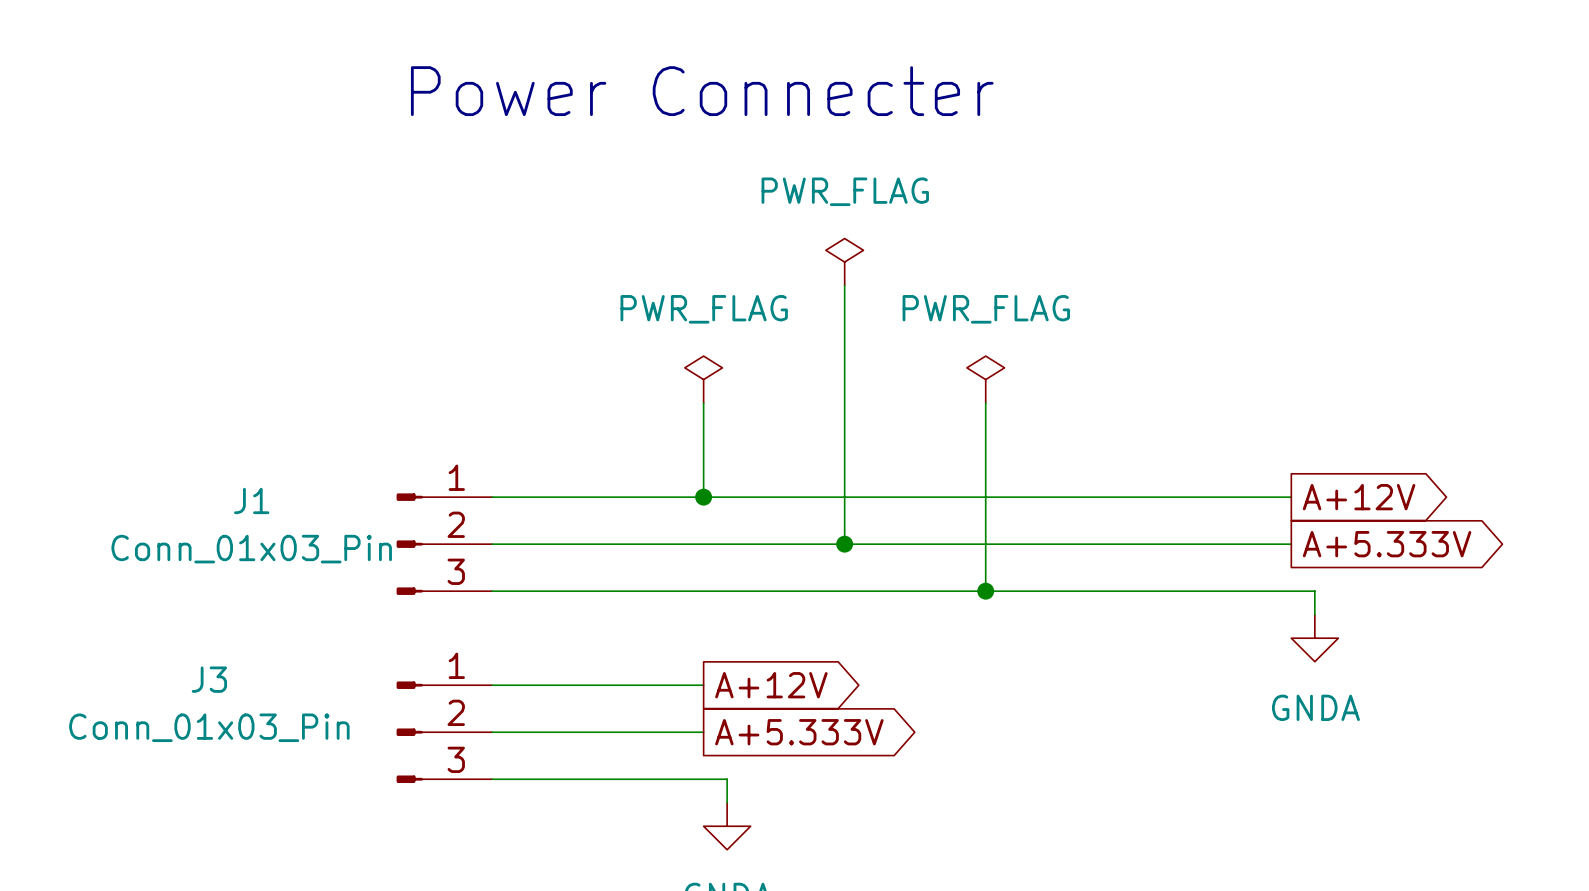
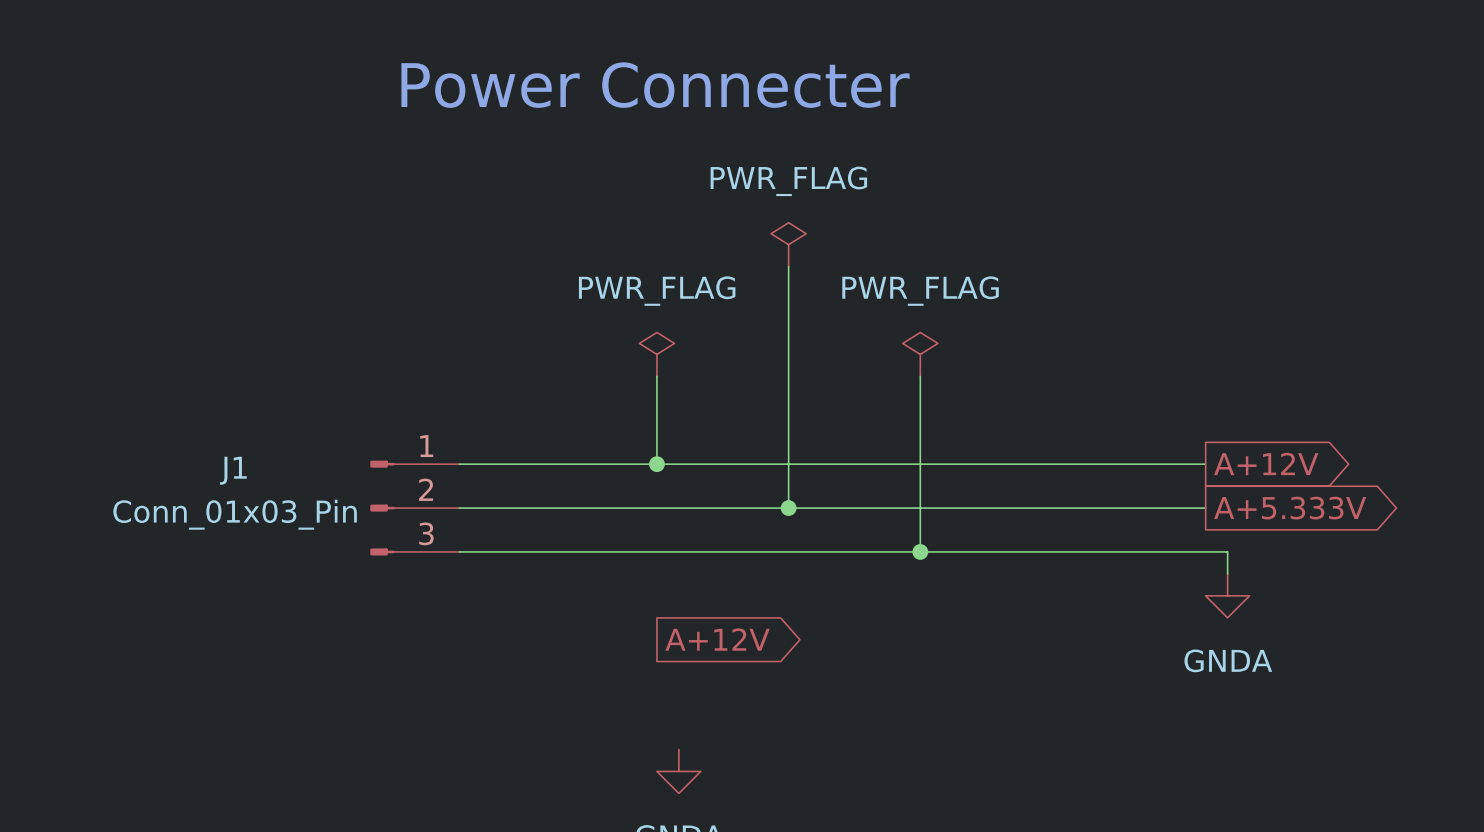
wire: (492, 685) (703, 685) -> none
J3: Conn_01x03_Pin (444, 732) -> none
wire: (492, 732) (703, 732) -> none
global label: A+5.333V (799, 732) -> none
wire: (492, 779) (727, 779) (727, 802) -> none

